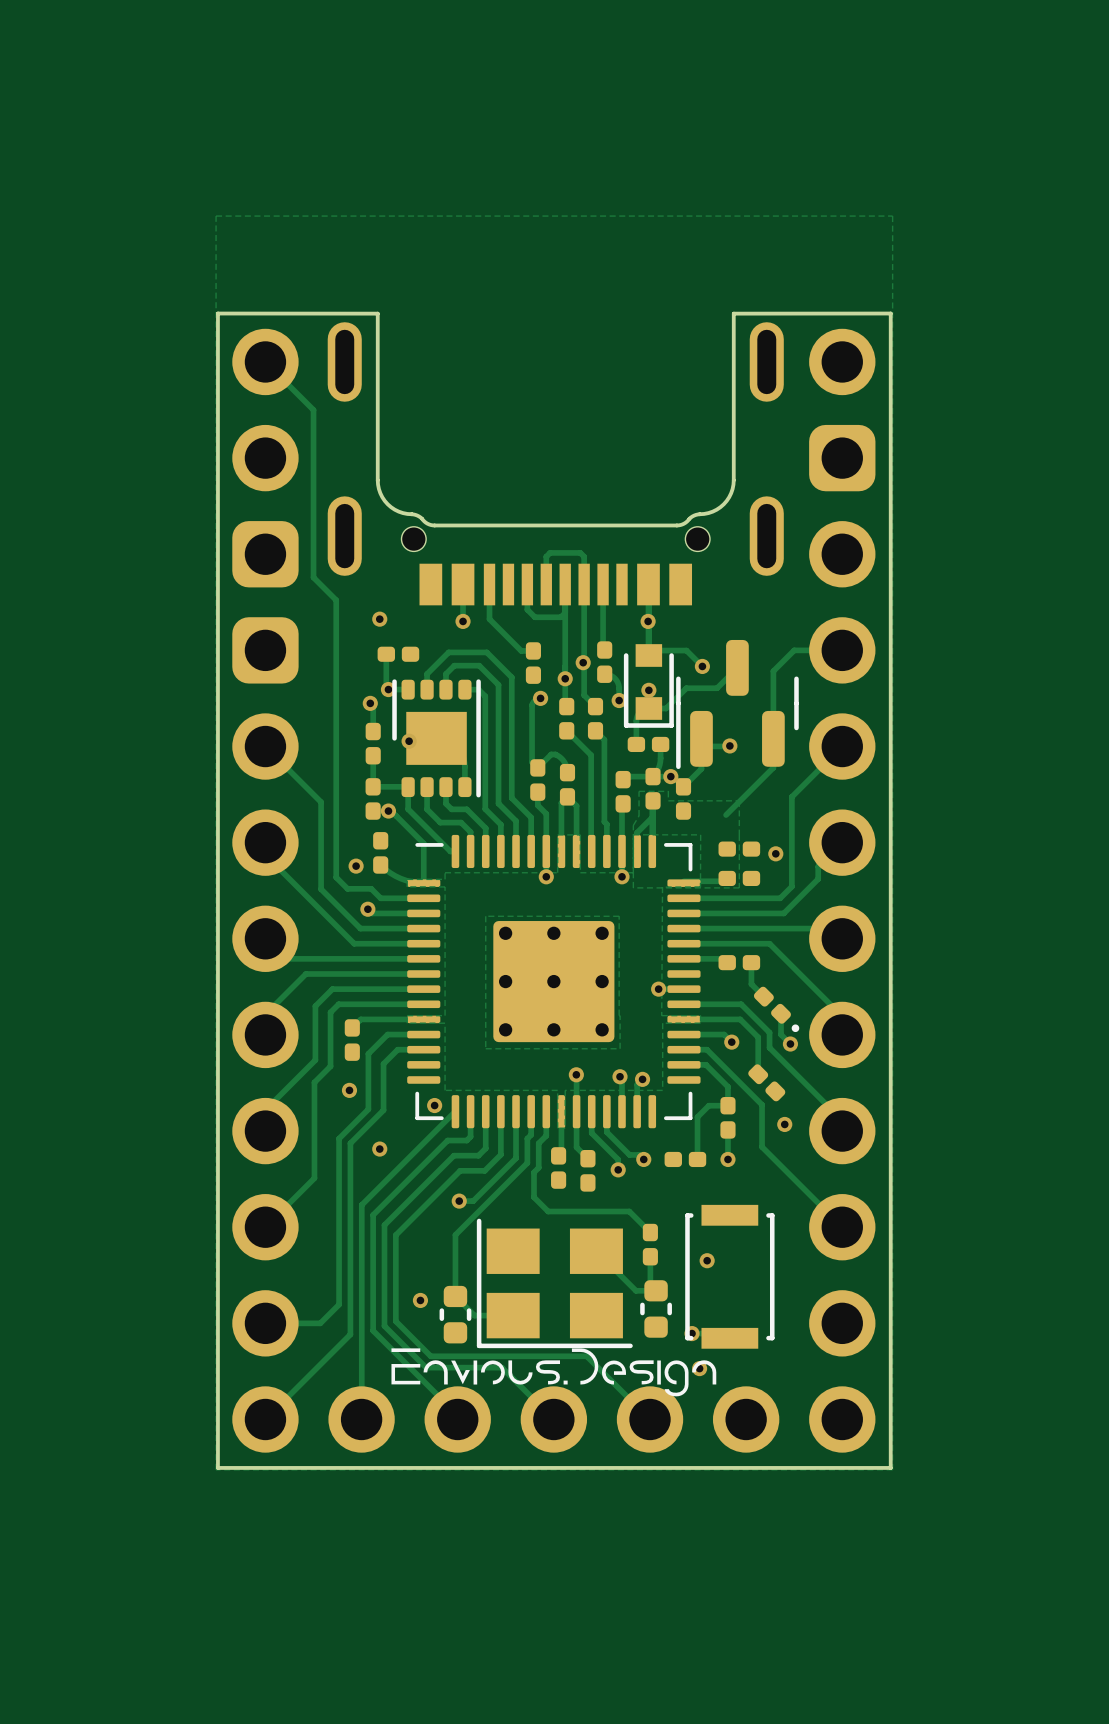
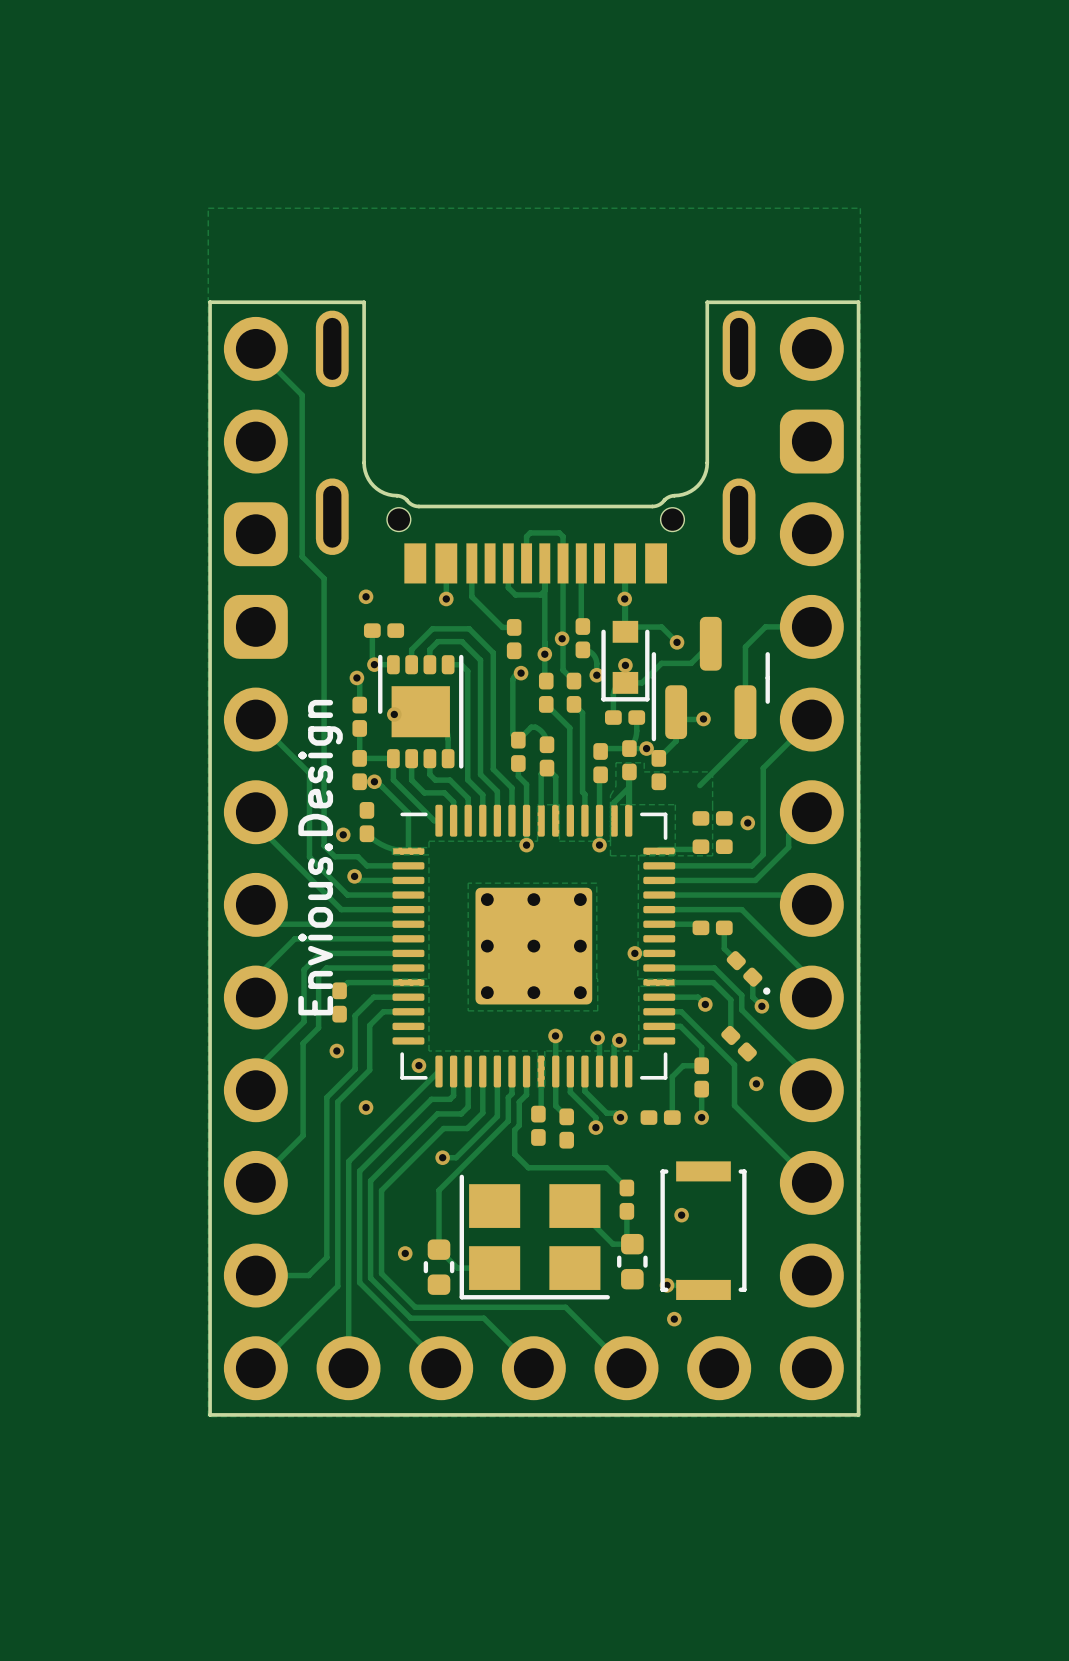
text: none -> Envious.Design (320, 857)
drawing: [391, 1348, 717, 1397] -> none

